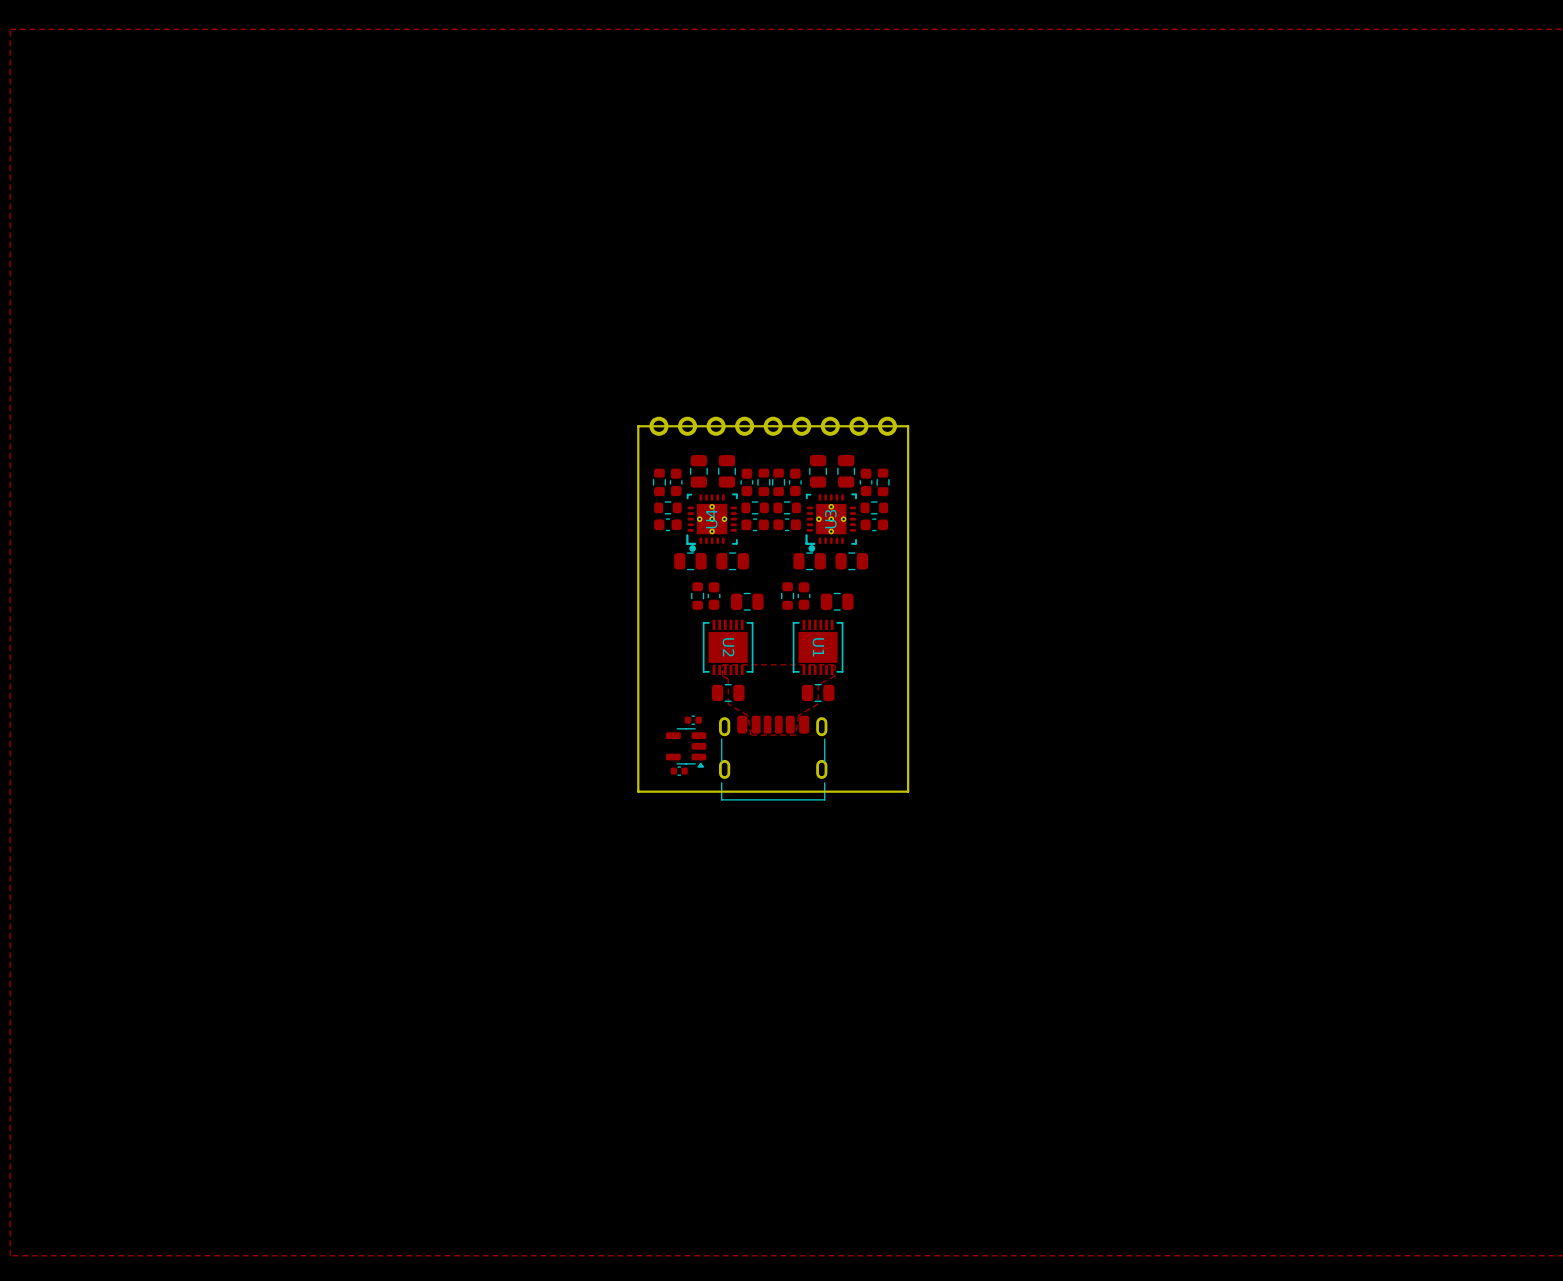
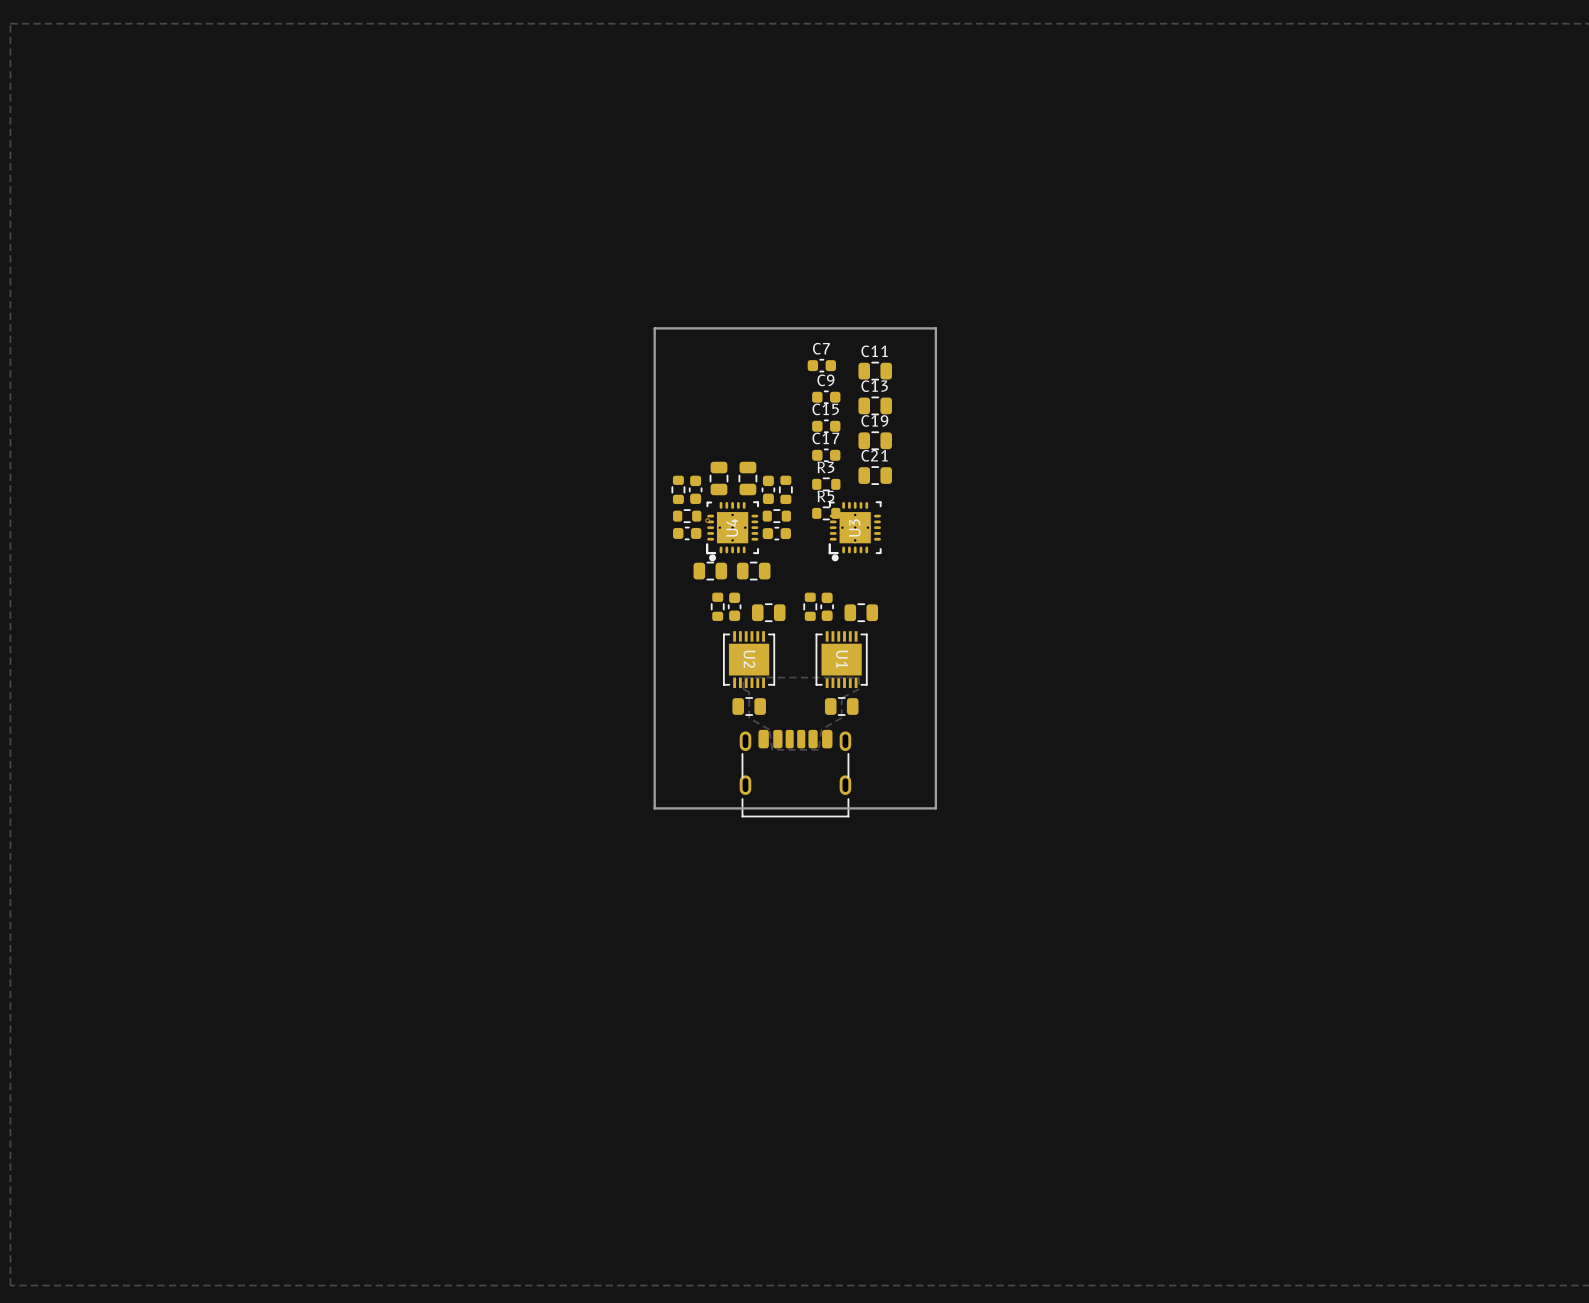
C7: none -> (821, 365)
C11: none -> (875, 371)
C9: none -> (826, 397)
C13: none -> (875, 405)
C15: none -> (826, 426)
board edge: (638, 426) (908, 426) (908, 791) (638, 791) (638, 426) -> (654, 328) (654, 808) (935, 808) (935, 328) (654, 328)
part: (773, 426) -> none
C19: none -> (875, 440)
C17: none -> (826, 455)
C21: none -> (875, 475)
part: (818, 471) -> none
part: (846, 471) -> none
R3: none -> (826, 484)
part: (778, 482) -> none
part: (795, 482) -> none
part: (866, 482) -> none
part: (883, 482) -> none
R5: none -> (826, 513)
part: (787, 507) -> none
part: (874, 507) -> none
via: none -> (707, 520)
part: (787, 524) -> none
part: (874, 524) -> none
part: (809, 561) -> none
part: (851, 561) -> none
part: (693, 720) -> none
part: (686, 747) -> none
part: (679, 771) -> none

